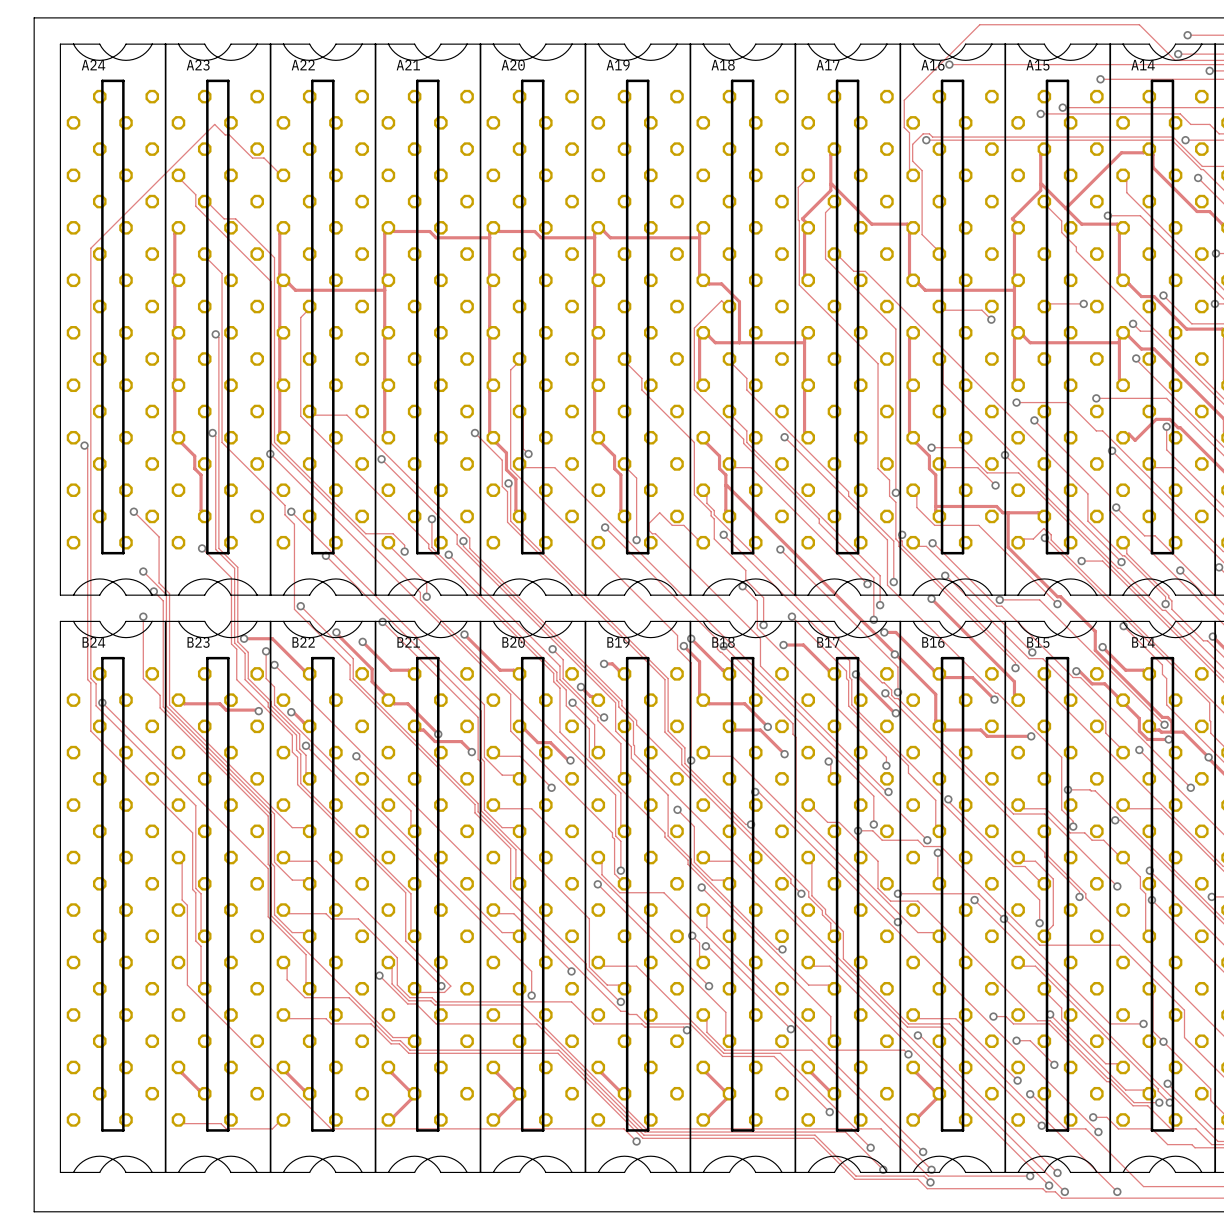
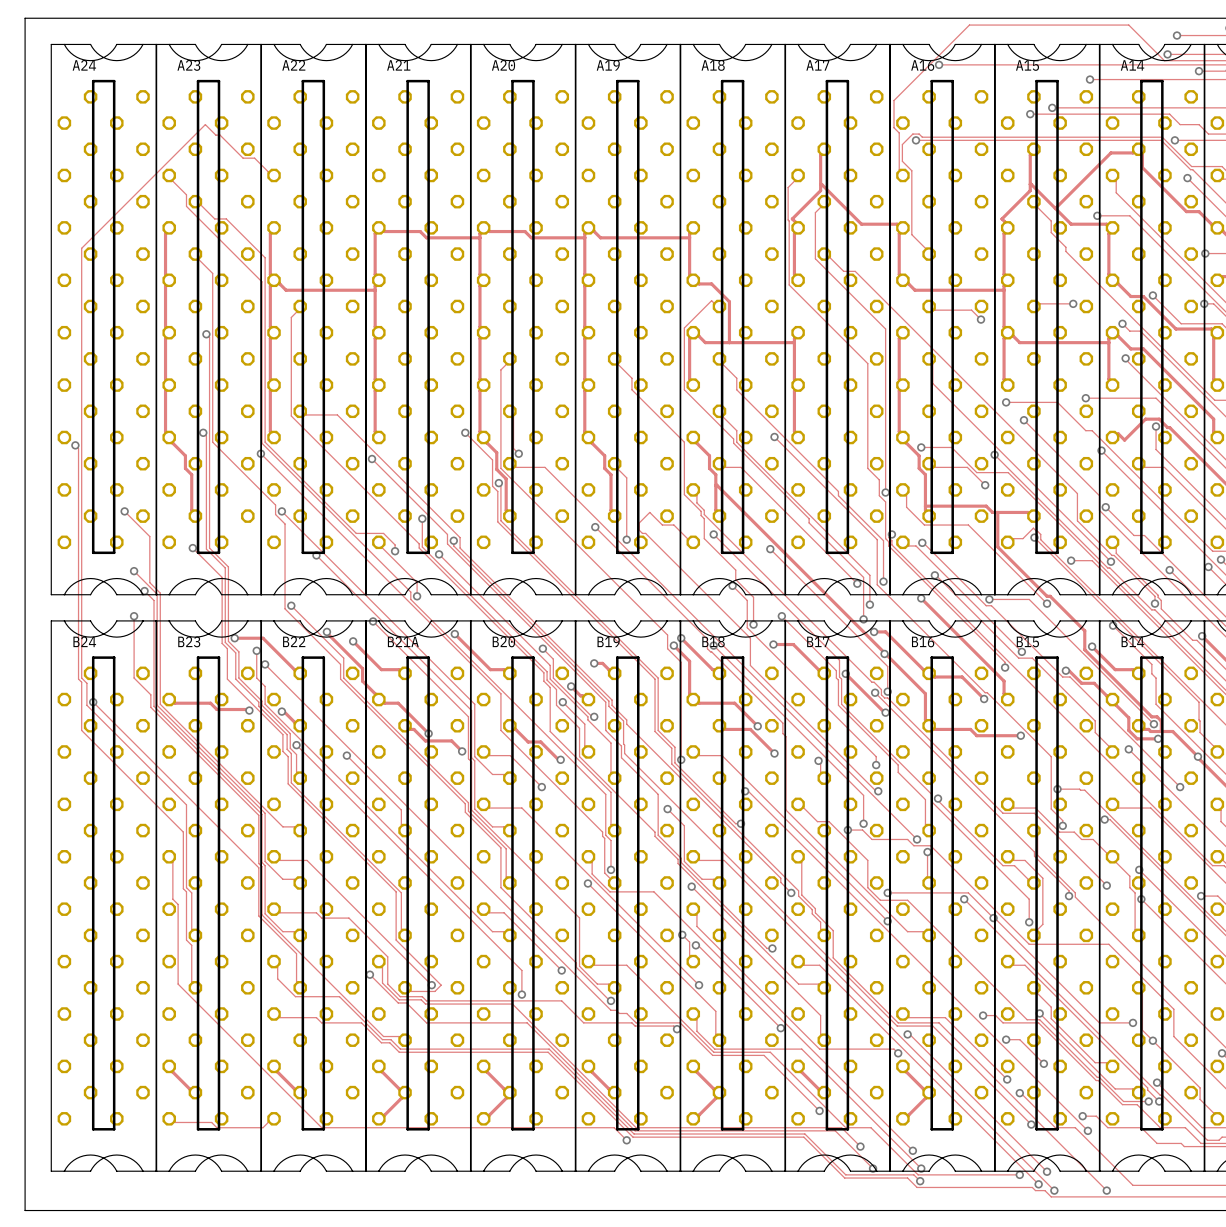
B21 name: B21 (408, 642) -> B21A (403, 641)

